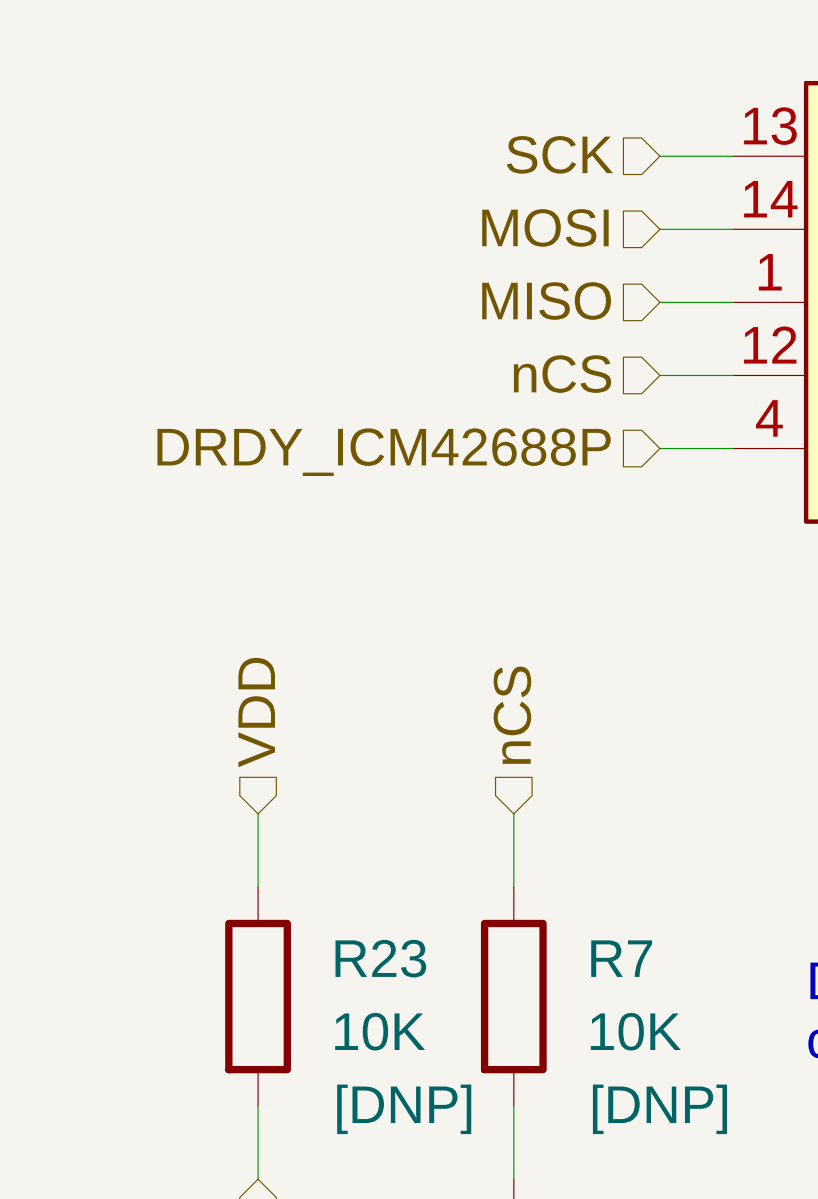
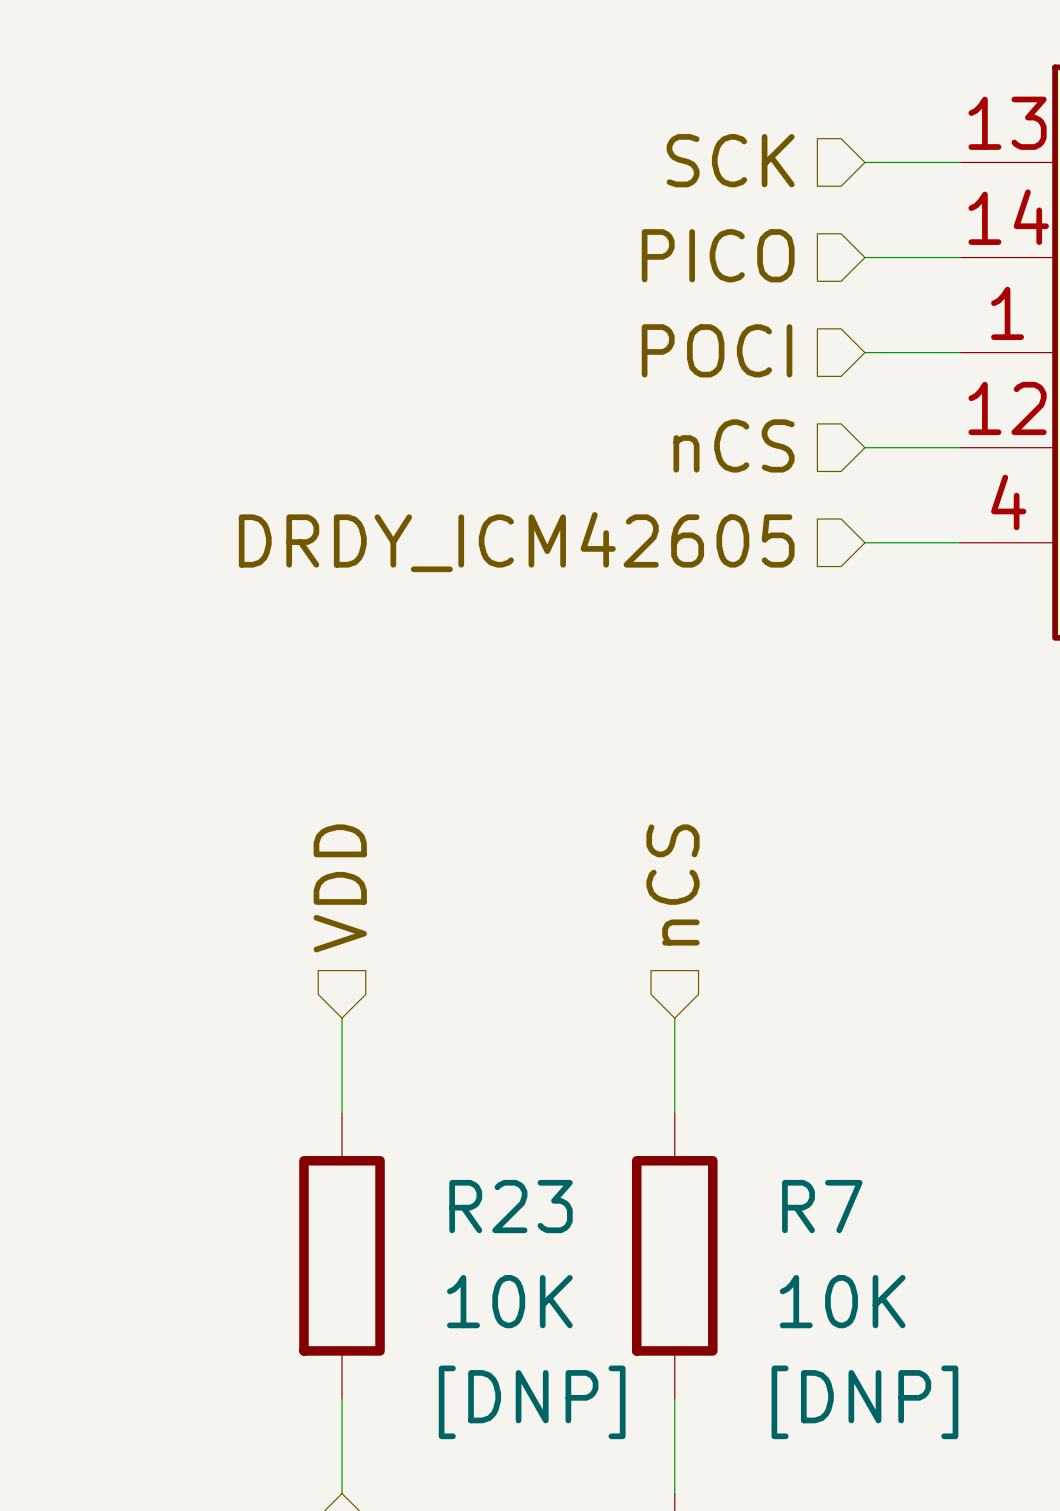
hierarchical label: MOSI (545, 227) -> PICO (718, 255)
hierarchical label: MISO (546, 301) -> POCI (717, 350)
hierarchical label: DRDY_ICM42688P (384, 452) -> DRDY_ICM42605 (516, 542)

